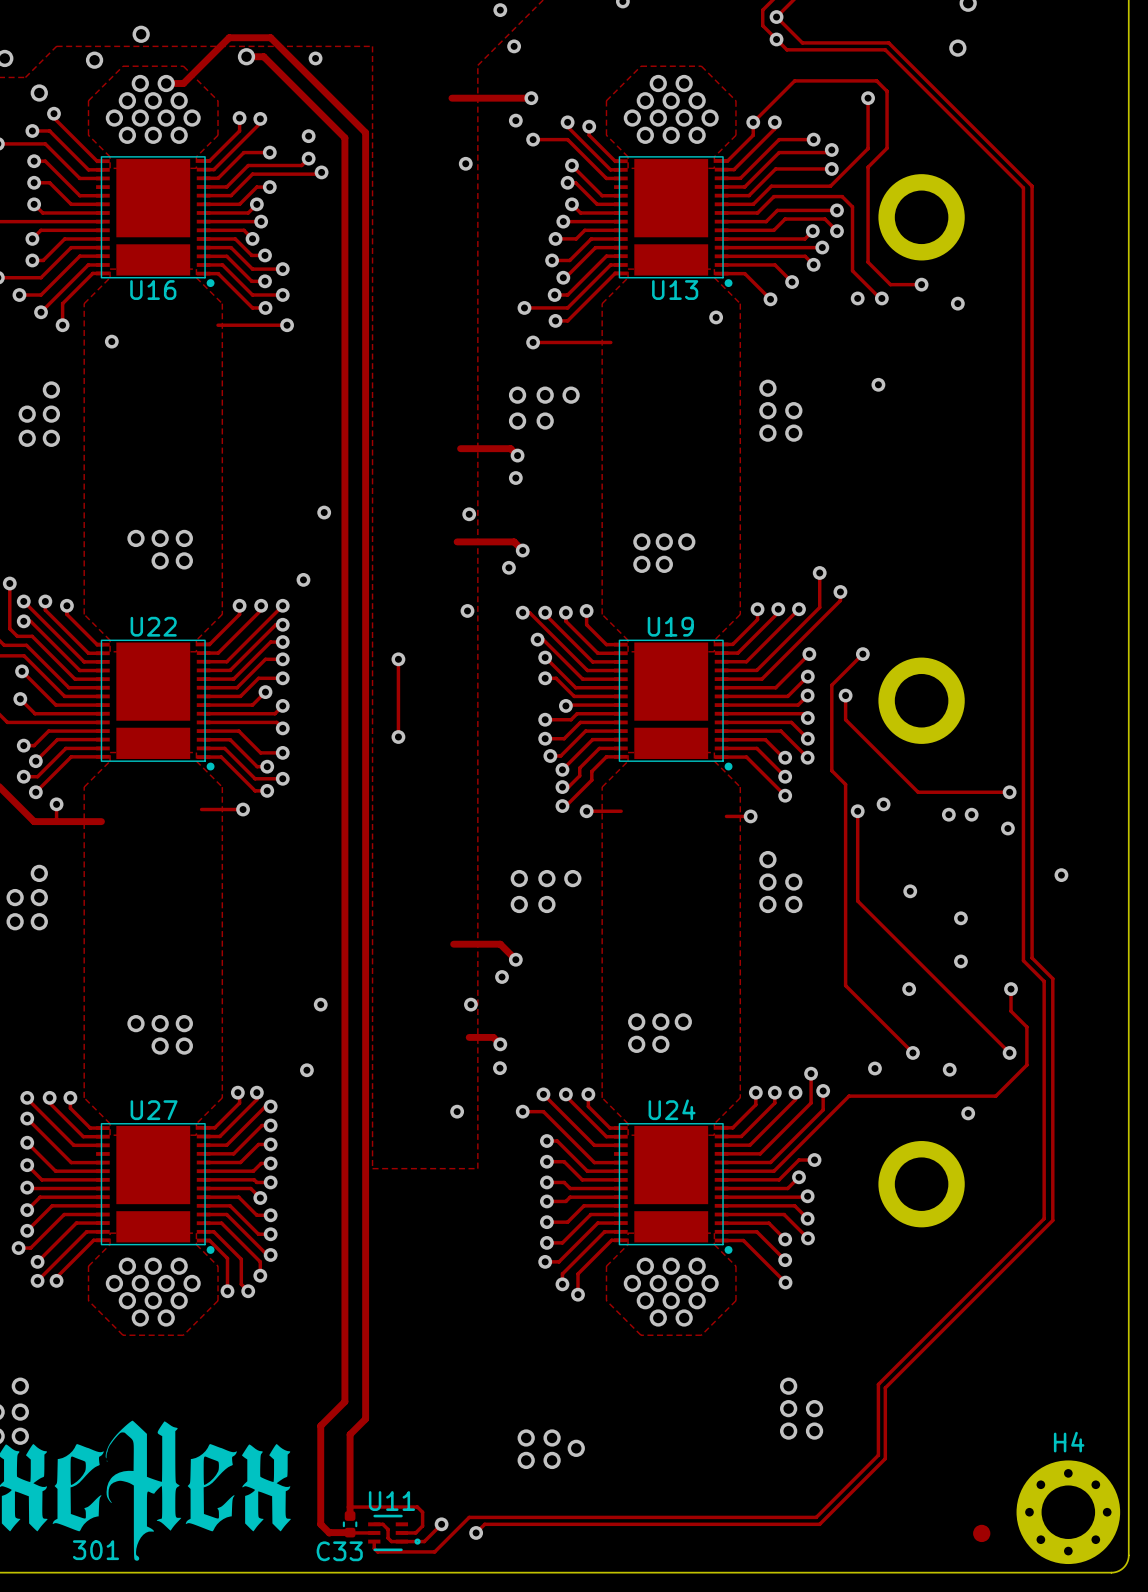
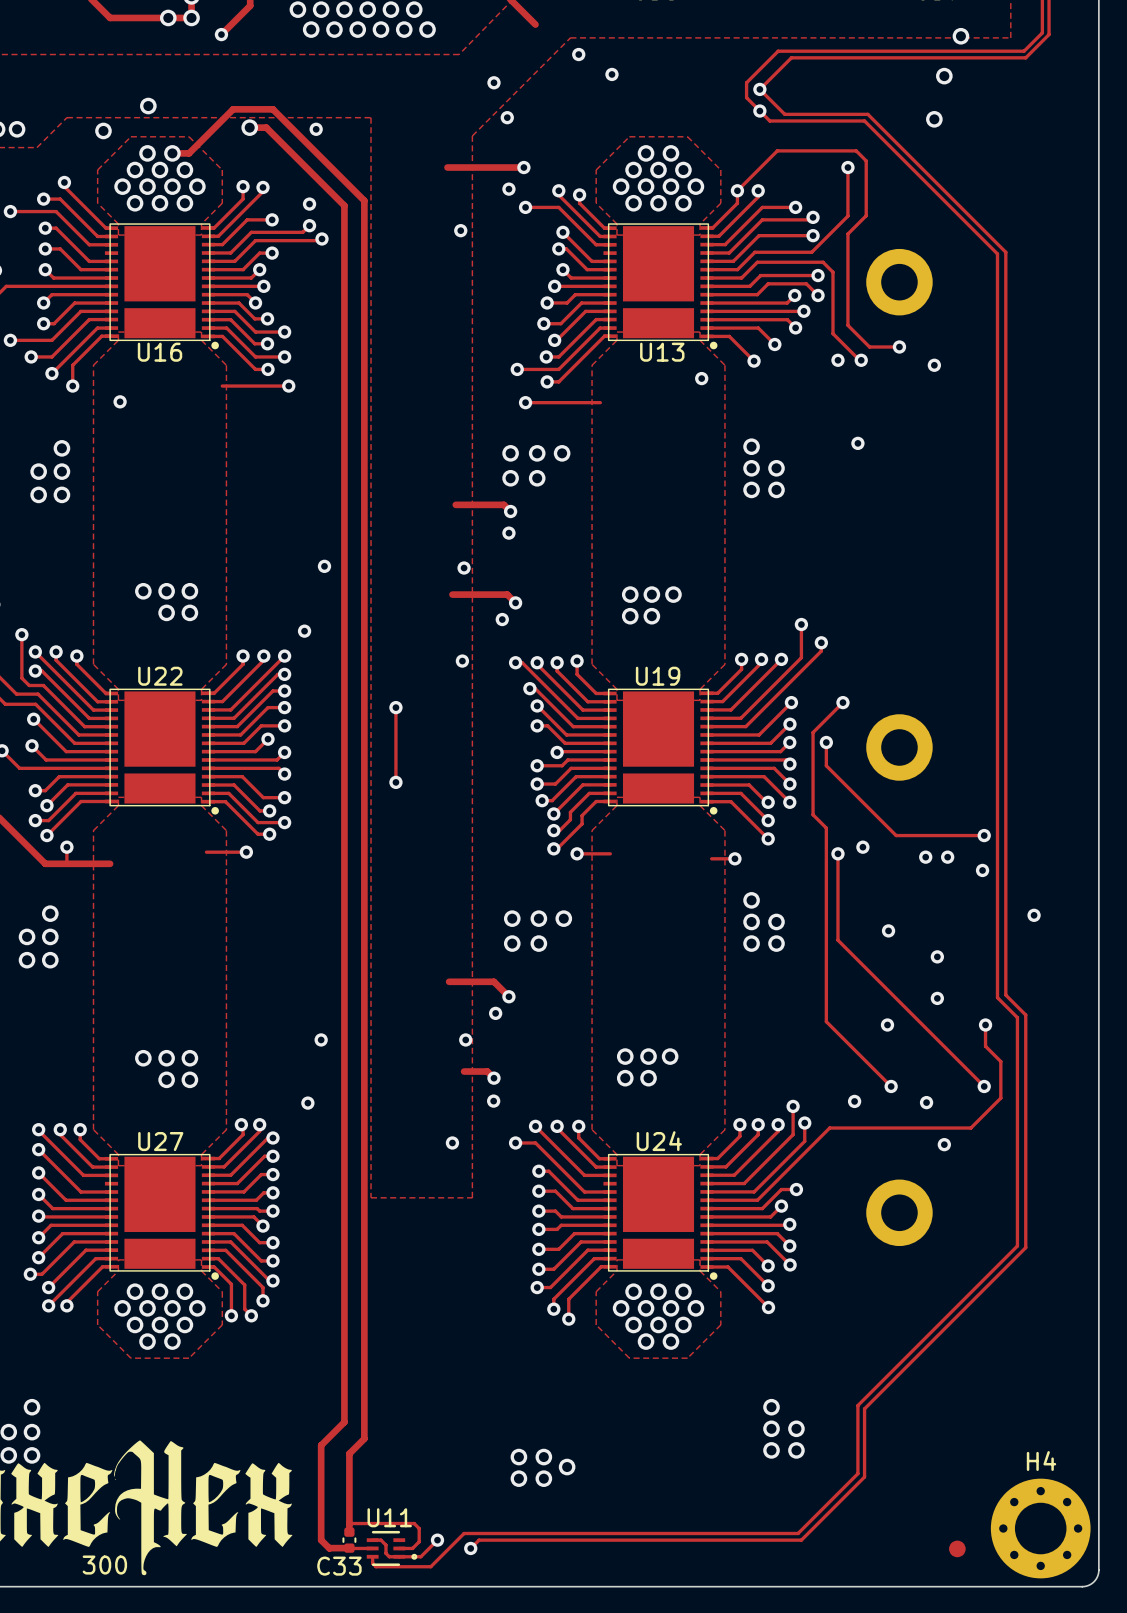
via: (39, 93) -> none
part footprint: [878, 174, 965, 261] -> [866, 248, 933, 316]
part footprint: [878, 657, 965, 744] -> [866, 714, 933, 781]
part footprint: [878, 1141, 965, 1228] -> [866, 1179, 933, 1247]
text: 301 (96, 1550) -> 300 (104, 1565)

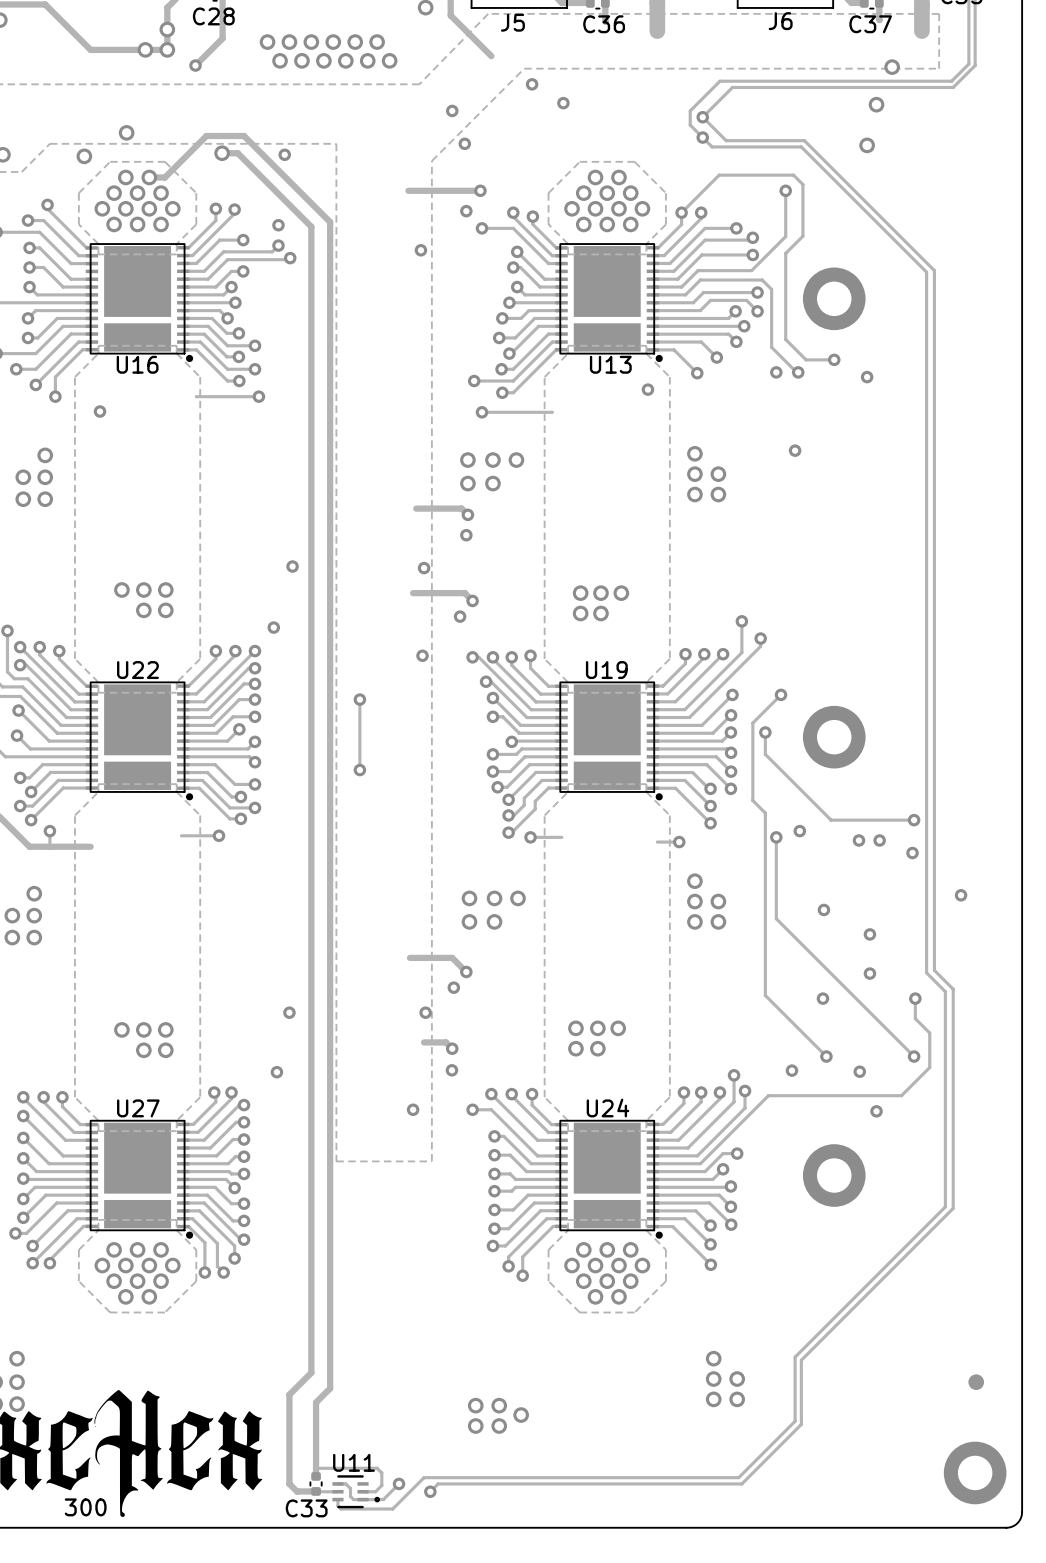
H4: (1040, 1528) -> none
part: none -> (975, 1472)
part position: (957, 1548) -> (976, 1382)

